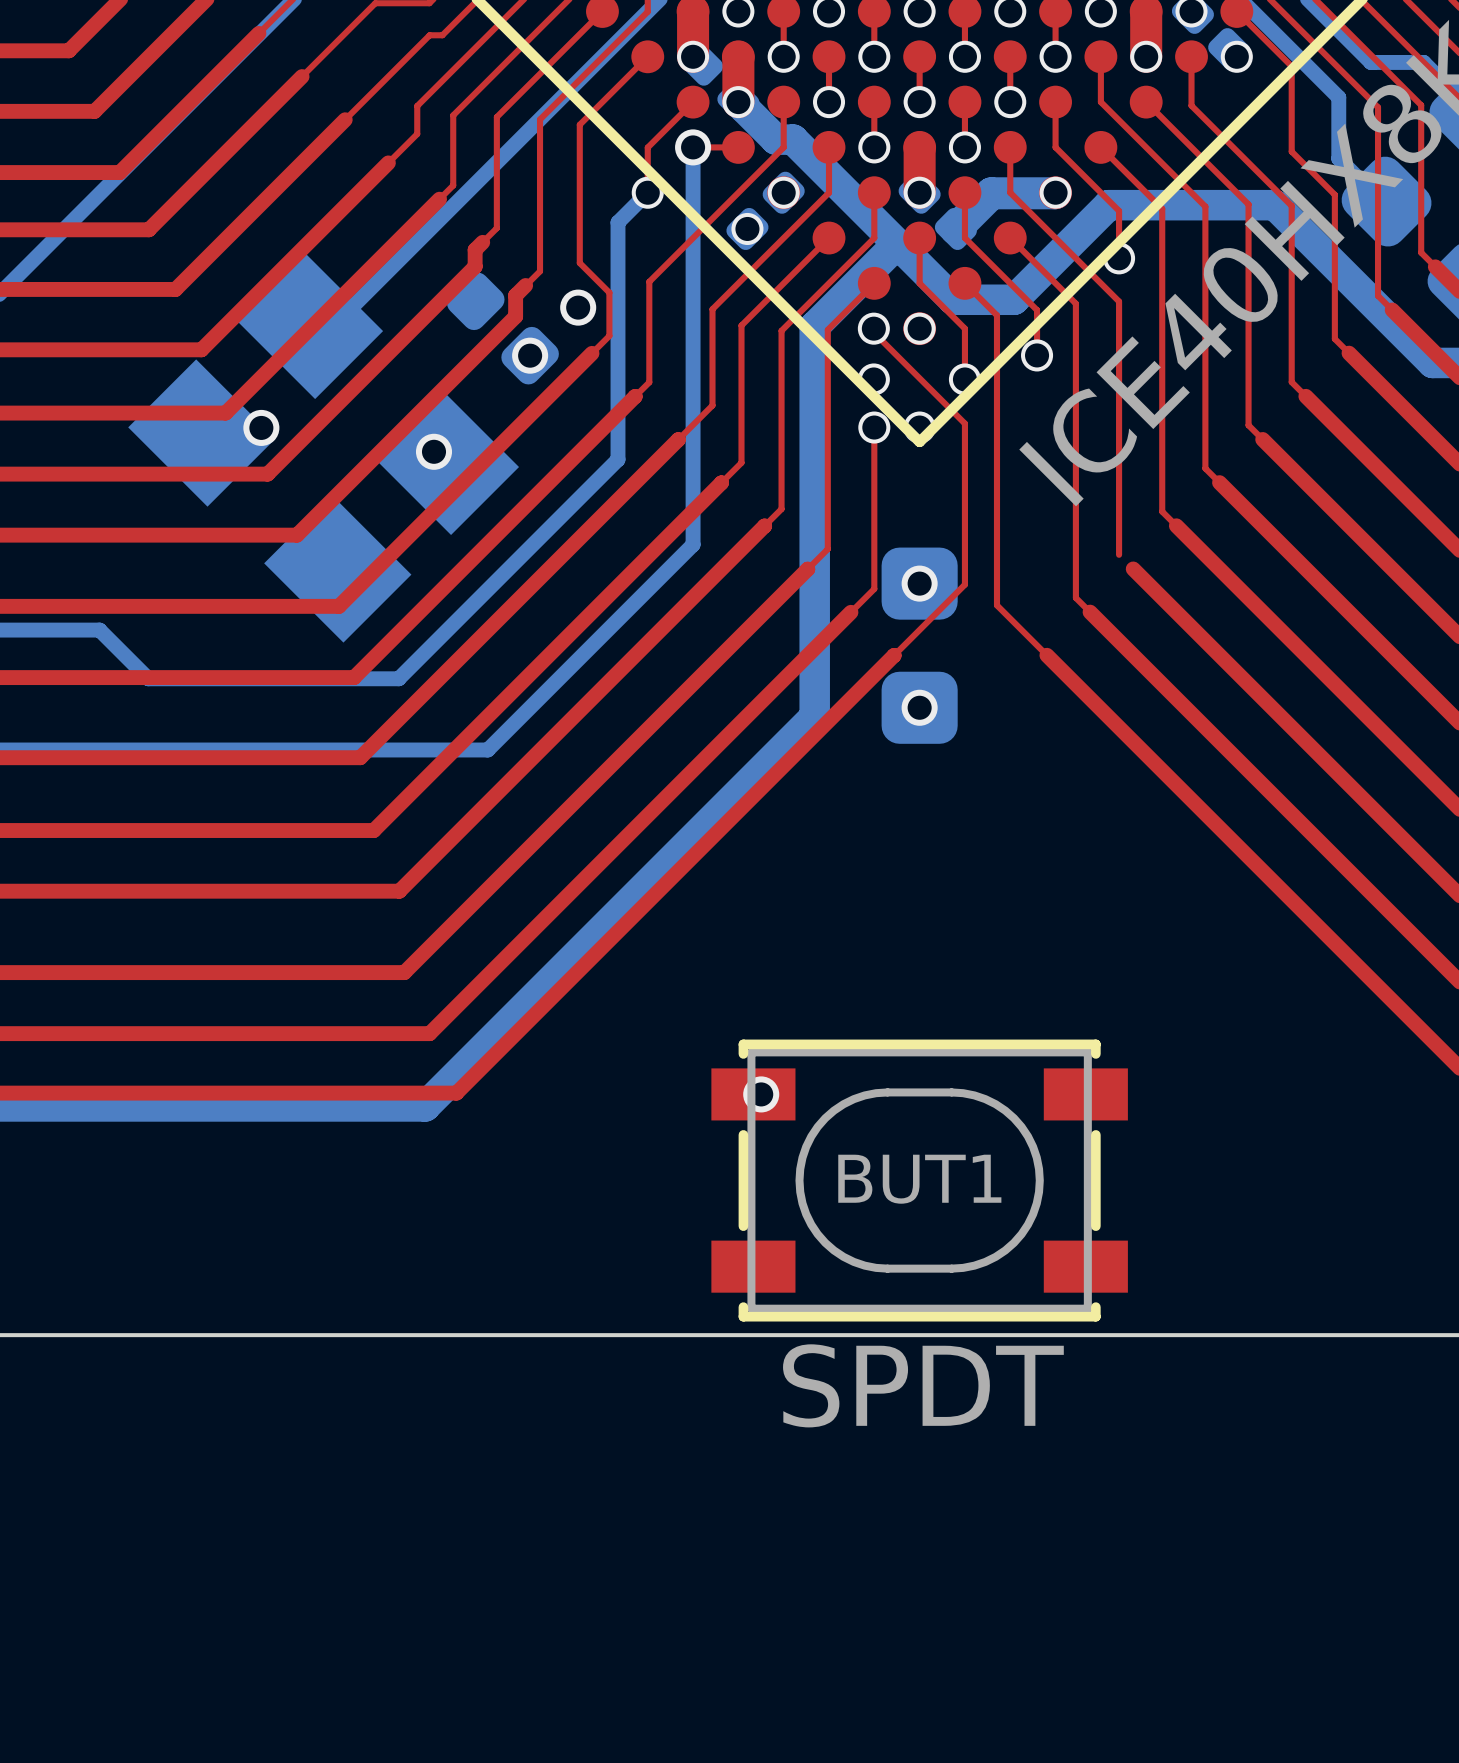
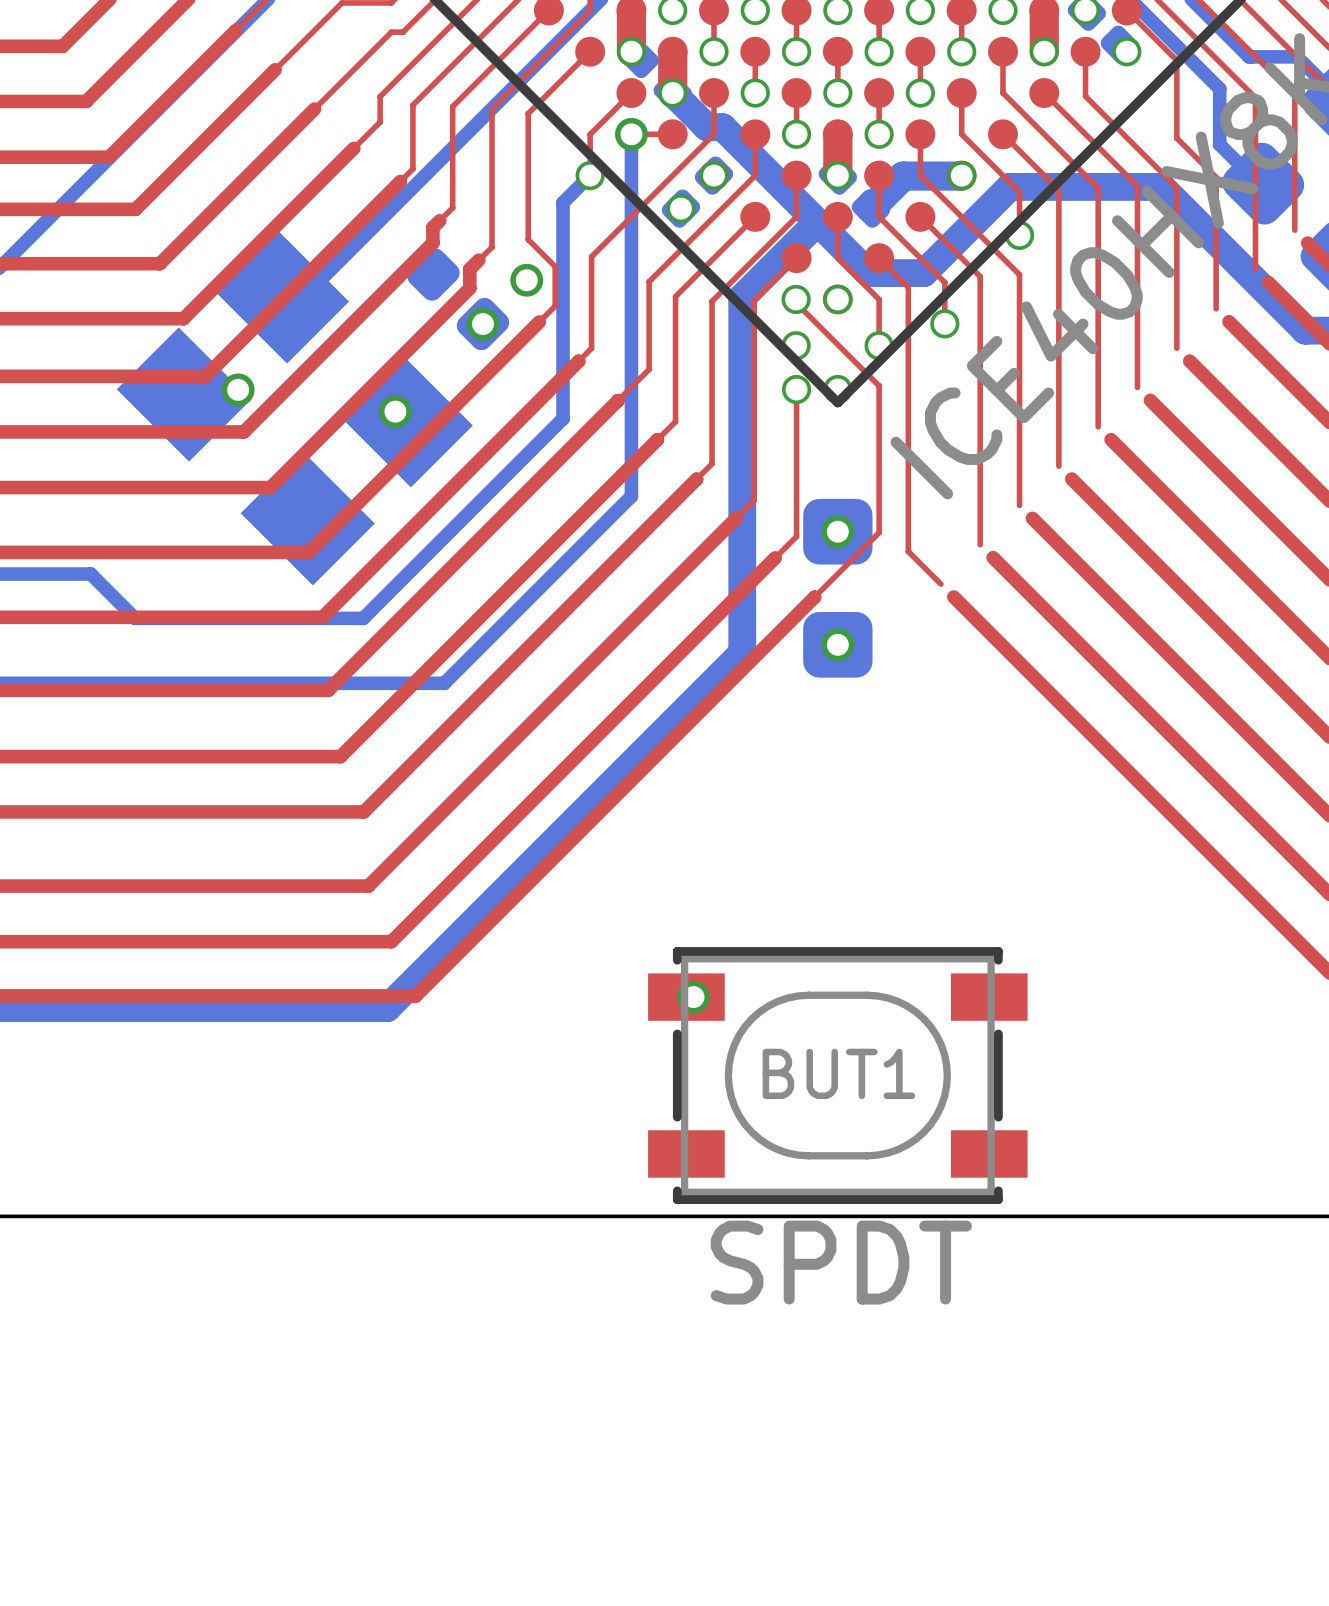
top track: (1421, 252) (1435, 266) -> none
top track: (1378, 295) (1392, 309) -> none
top track: (1334, 338) (1349, 353) -> none
top track: (1291, 382) (1305, 396) -> none
top track: (1248, 425) (1262, 439) -> none
top track: (1205, 468) (1219, 482) -> none
top track: (1162, 511) (1176, 525) -> none
top track: (1075, 597) (1090, 612) -> none
top track: (1032, 641) (1046, 655) -> none

